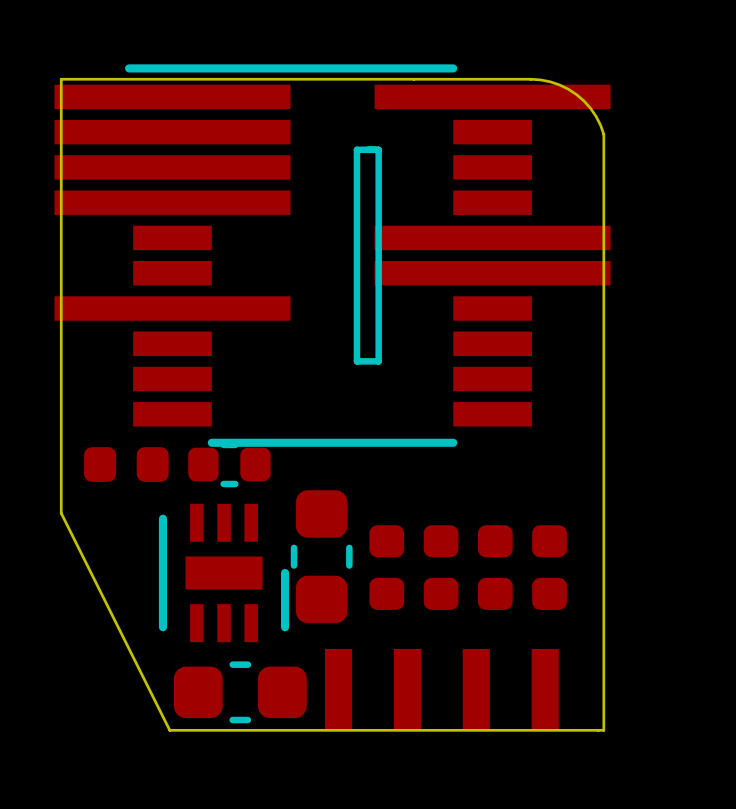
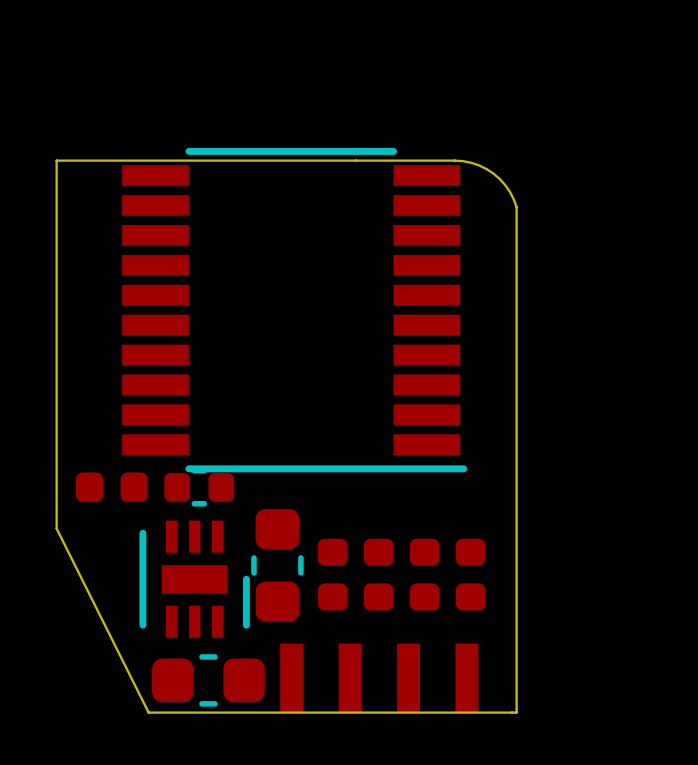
part footprint: [54, 64, 611, 447] -> [122, 147, 468, 473]

